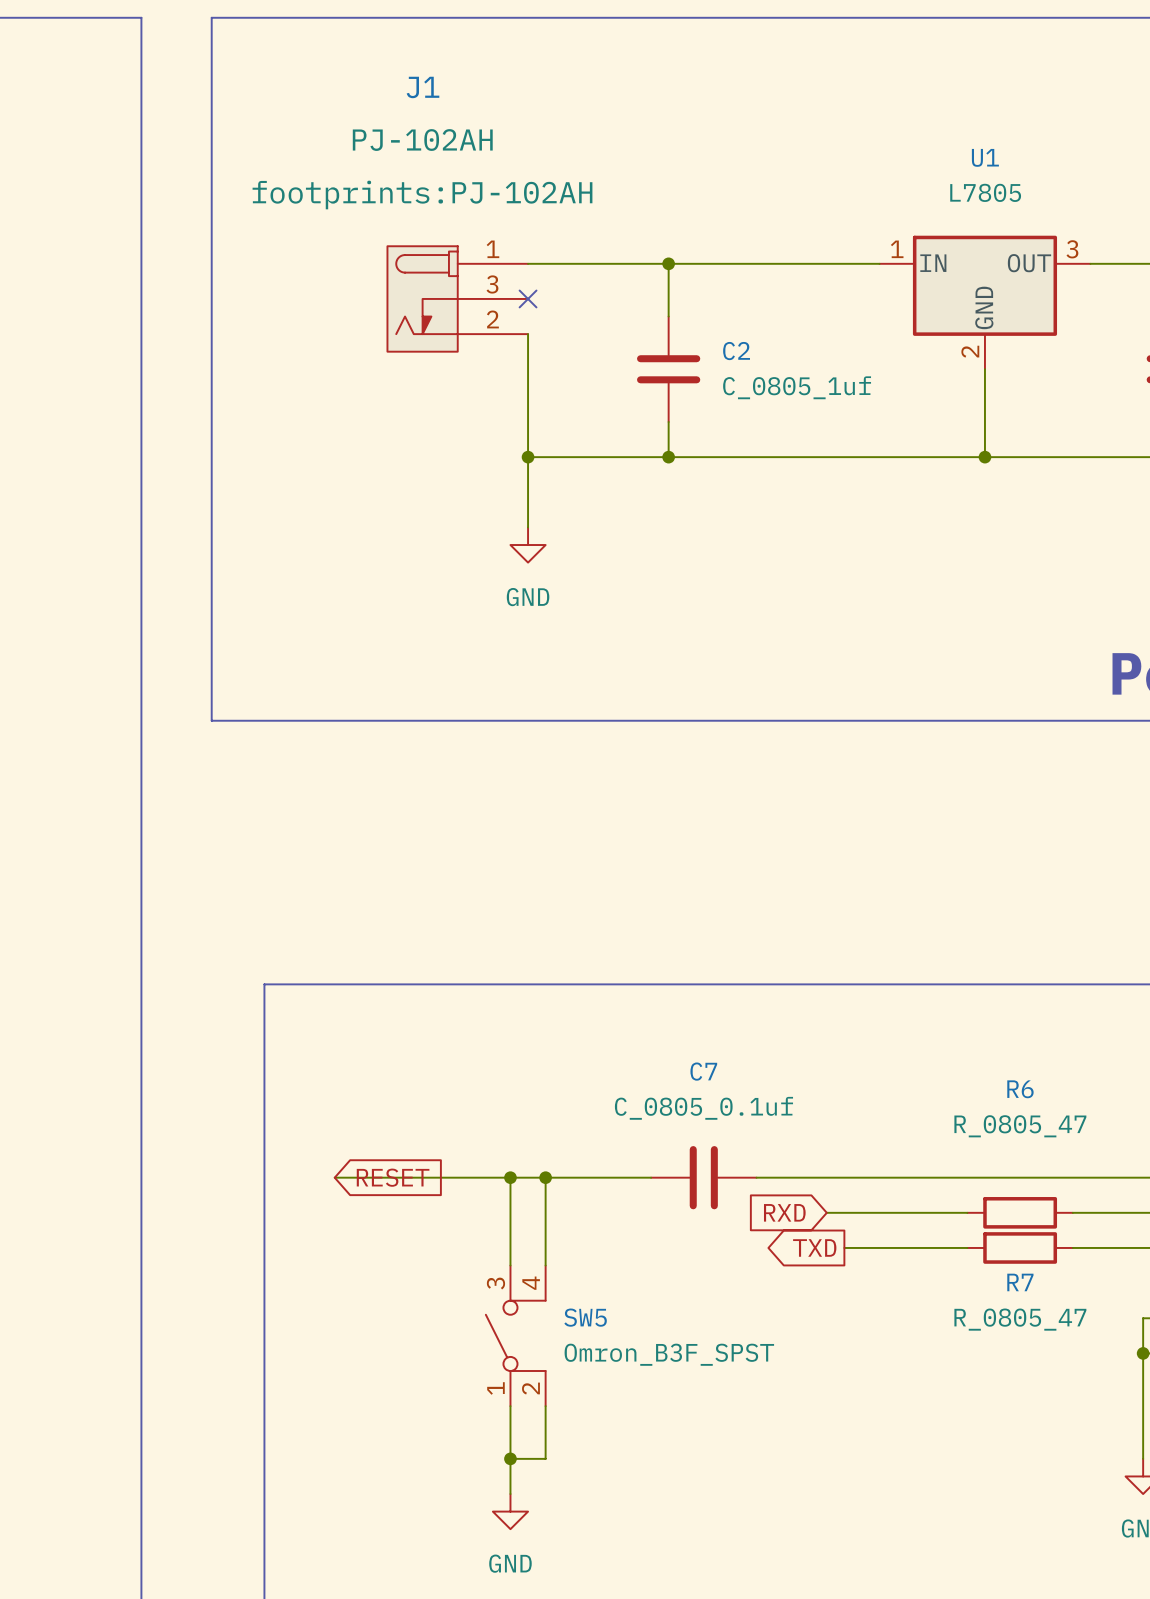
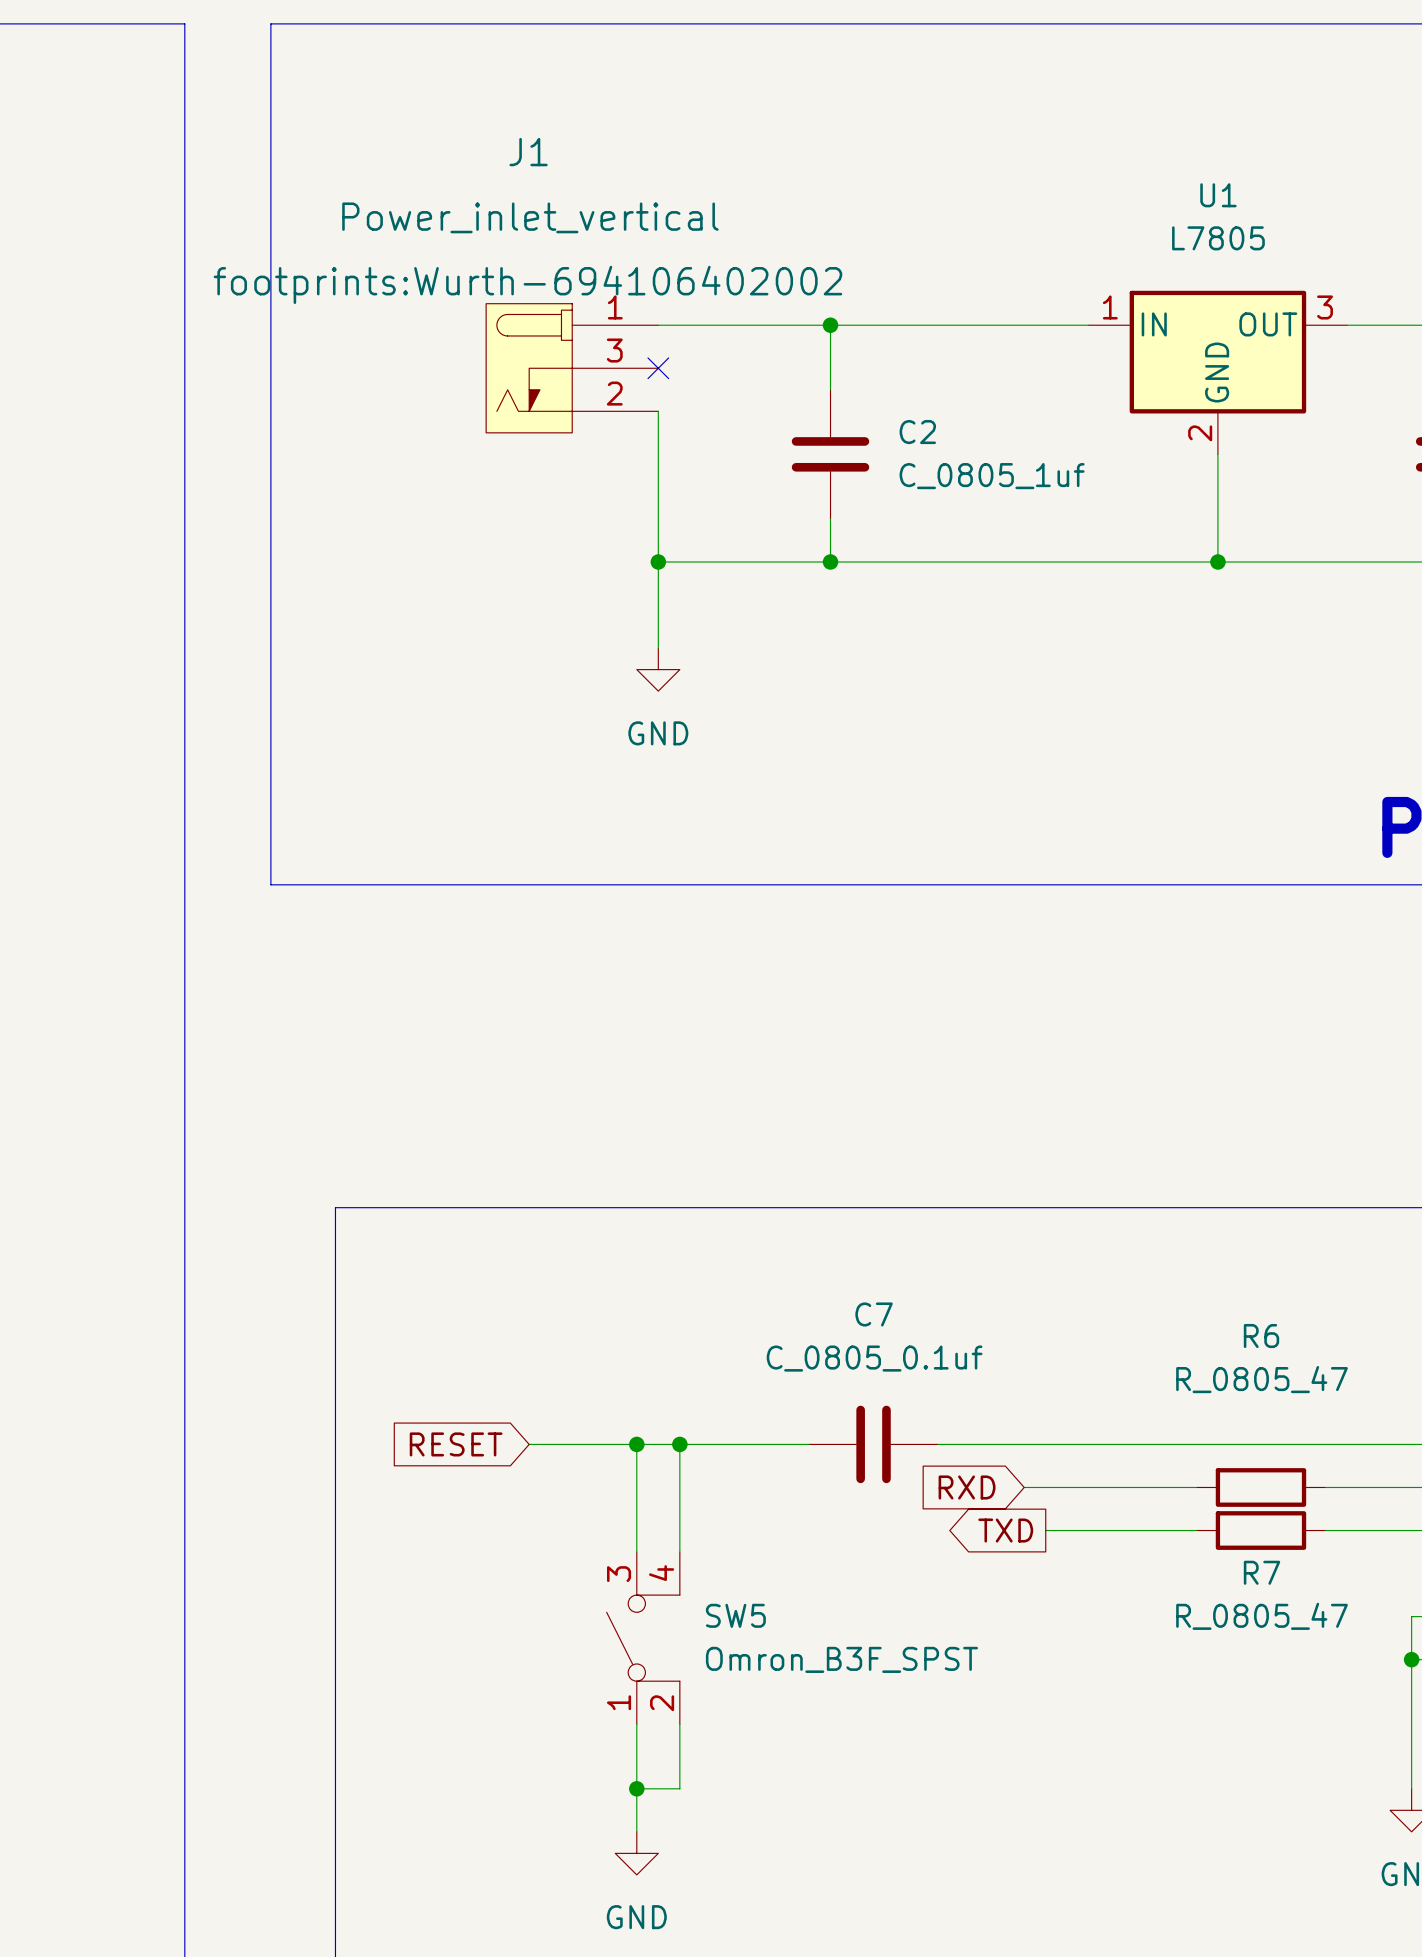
J1 name position: J1 (423, 87) -> J1 (528, 152)
J1 value: PJ-102AH (422, 140) -> Power_inlet_vertical (530, 217)
J1 text: footprints:PJ-102AH (422, 195) -> footprints:Wurth-694106402002 (527, 284)
wire: (334, 1177) (422, 1177) -> none
global label rotation: 0° (393, 1177) -> 180° (456, 1444)

